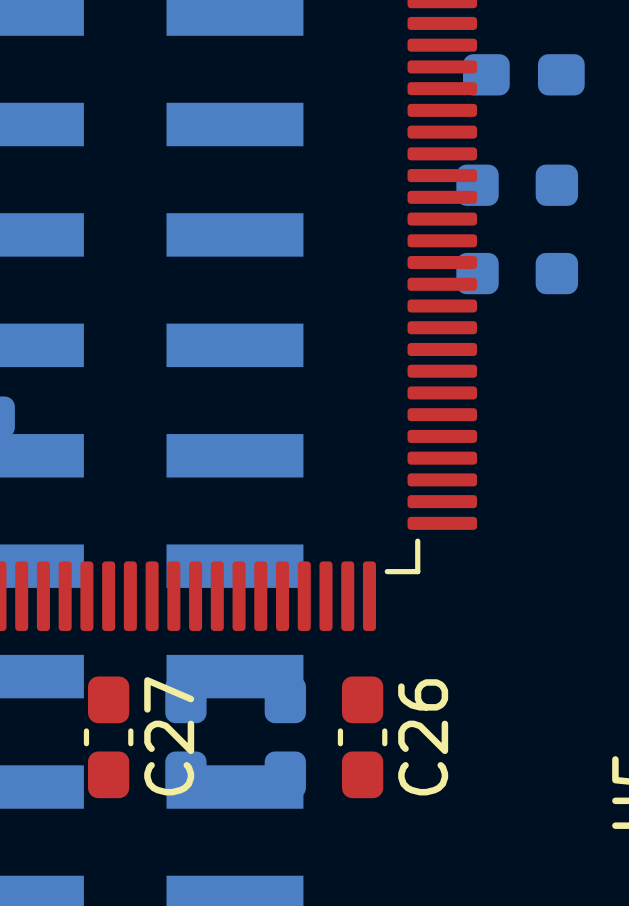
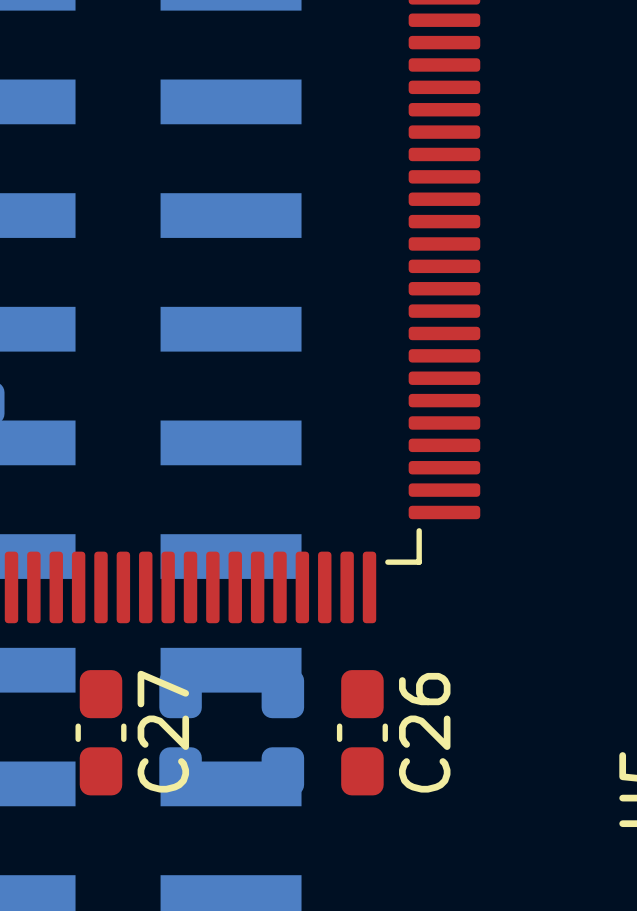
part: (523, 74) -> none
part: (517, 185) -> none
part: (517, 273) -> none

